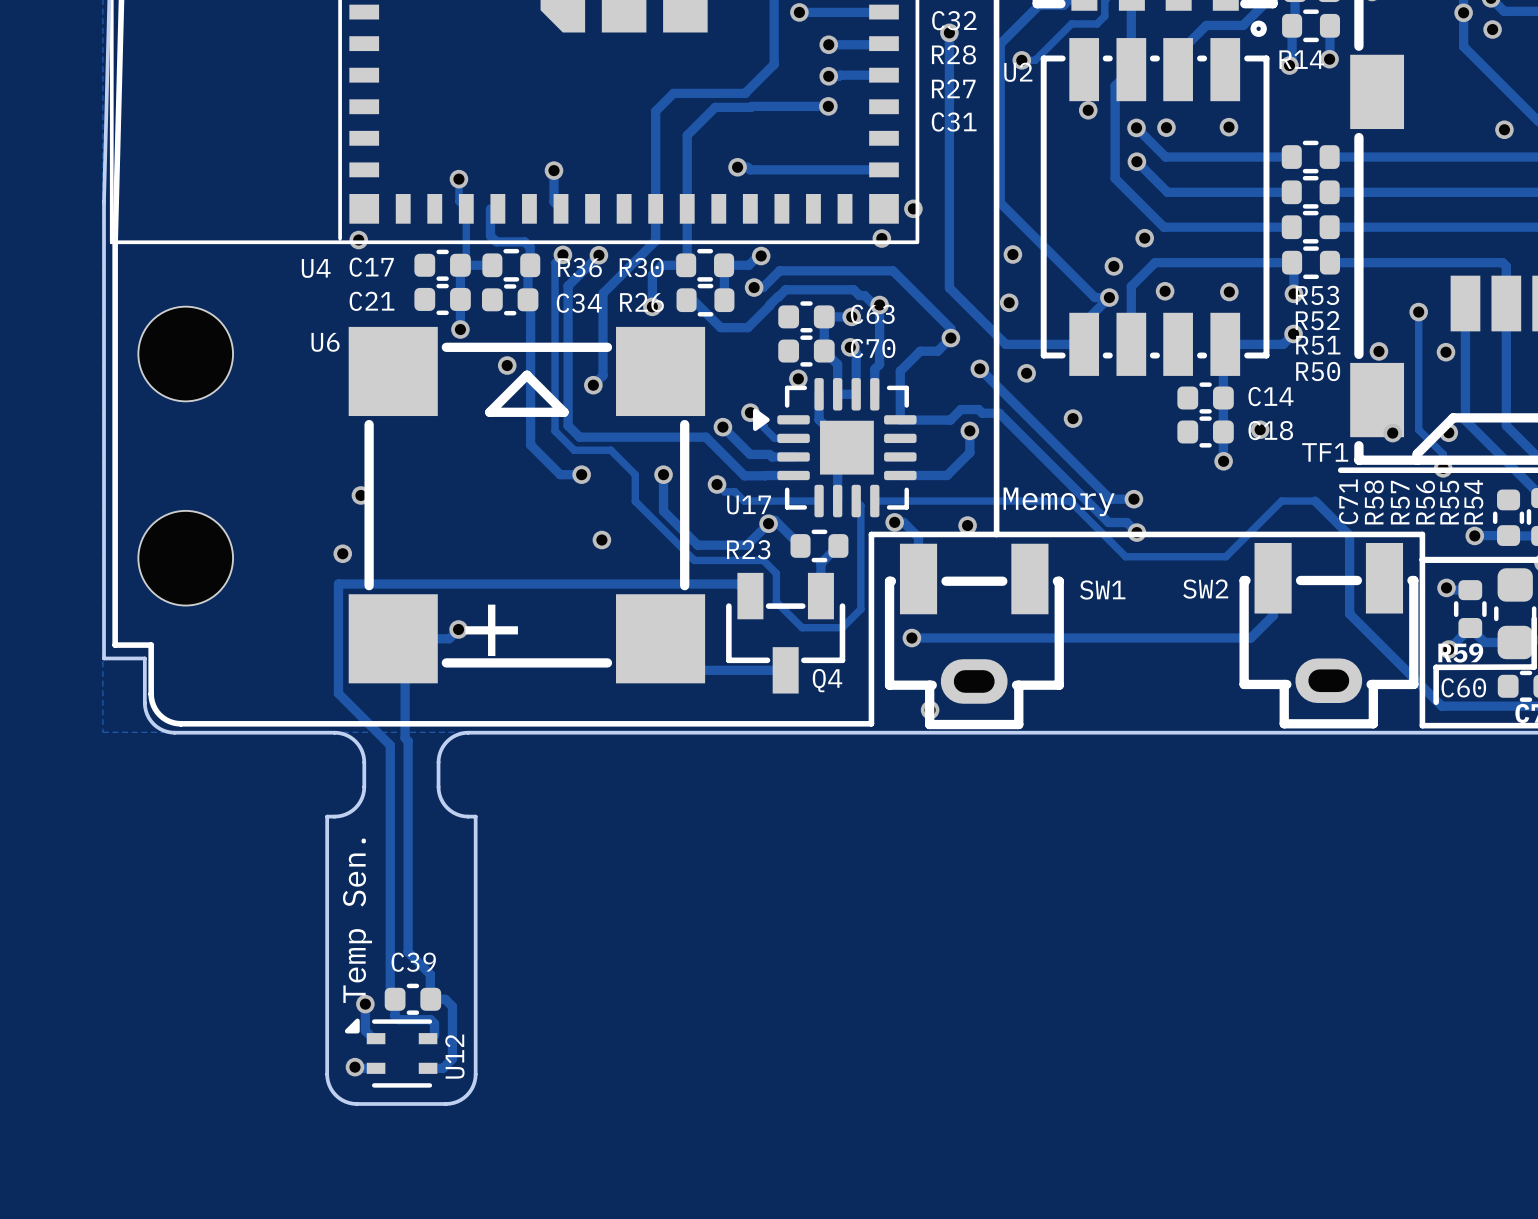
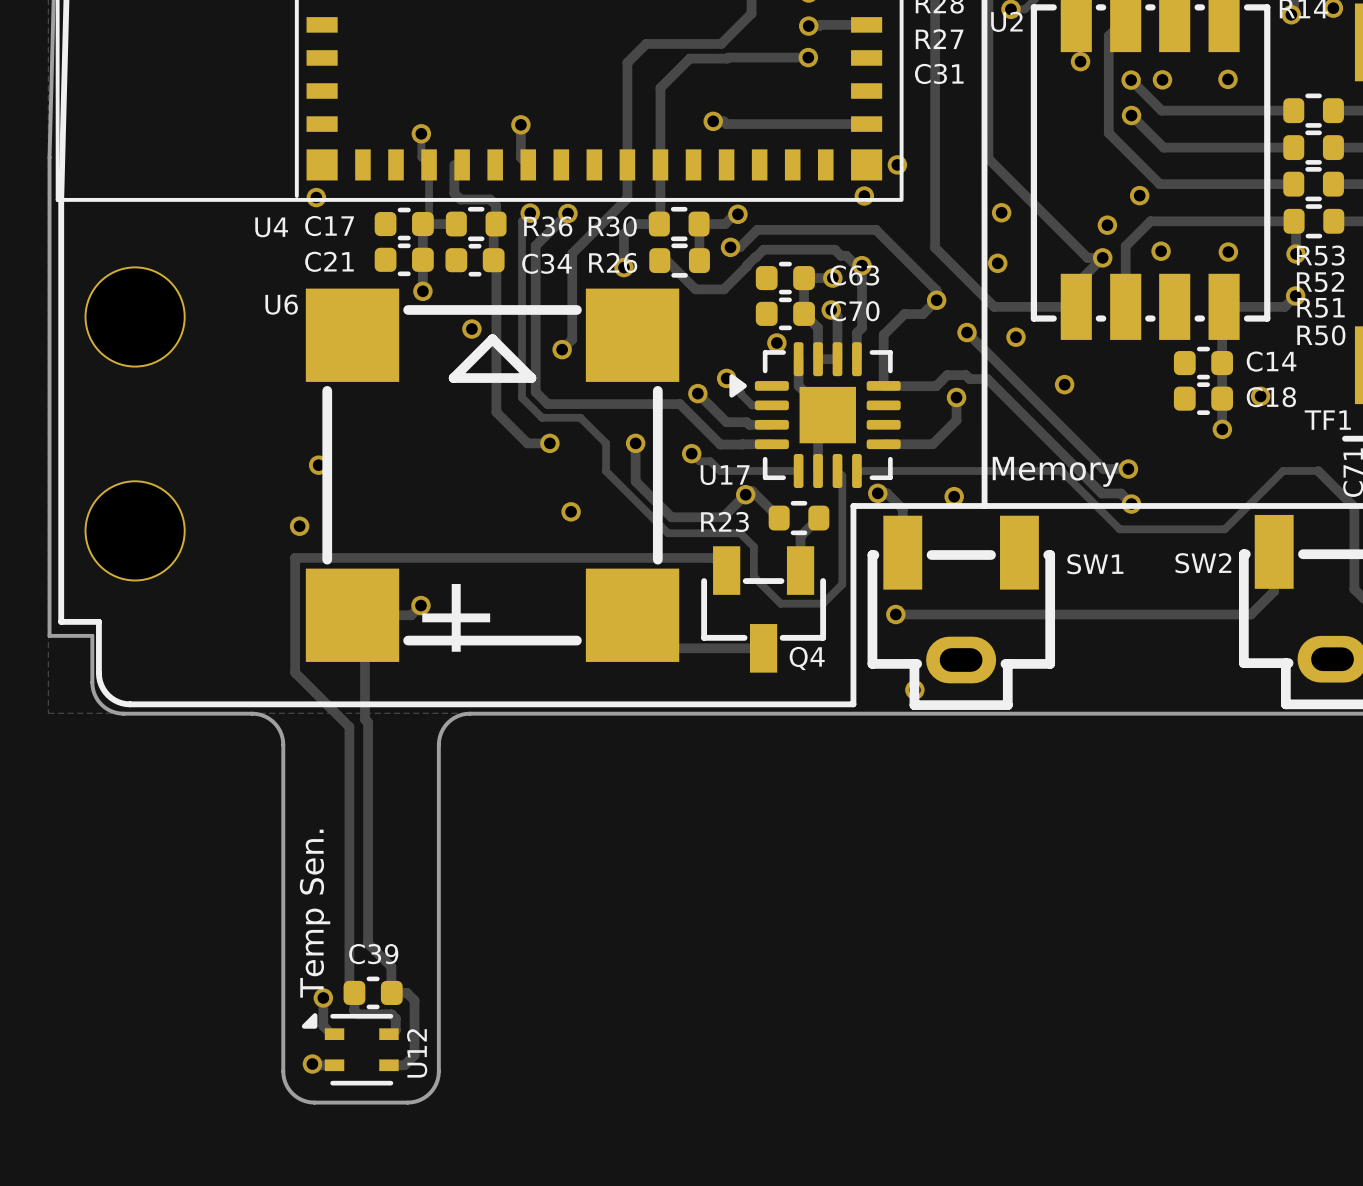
board edge: (297, 732) (344, 734) (355, 741) (362, 752) (364, 786) (360, 801) (355, 807) (345, 814) (327, 816) -> (252, 713) (262, 715) (271, 720) (281, 734) (283, 801)
board edge: (505, 732) (458, 734) (447, 741) (440, 752) (438, 786) (442, 801) (450, 810) (456, 814) (475, 816) -> (469, 713) (458, 716) (451, 720) (441, 732) (438, 744) (438, 801)

